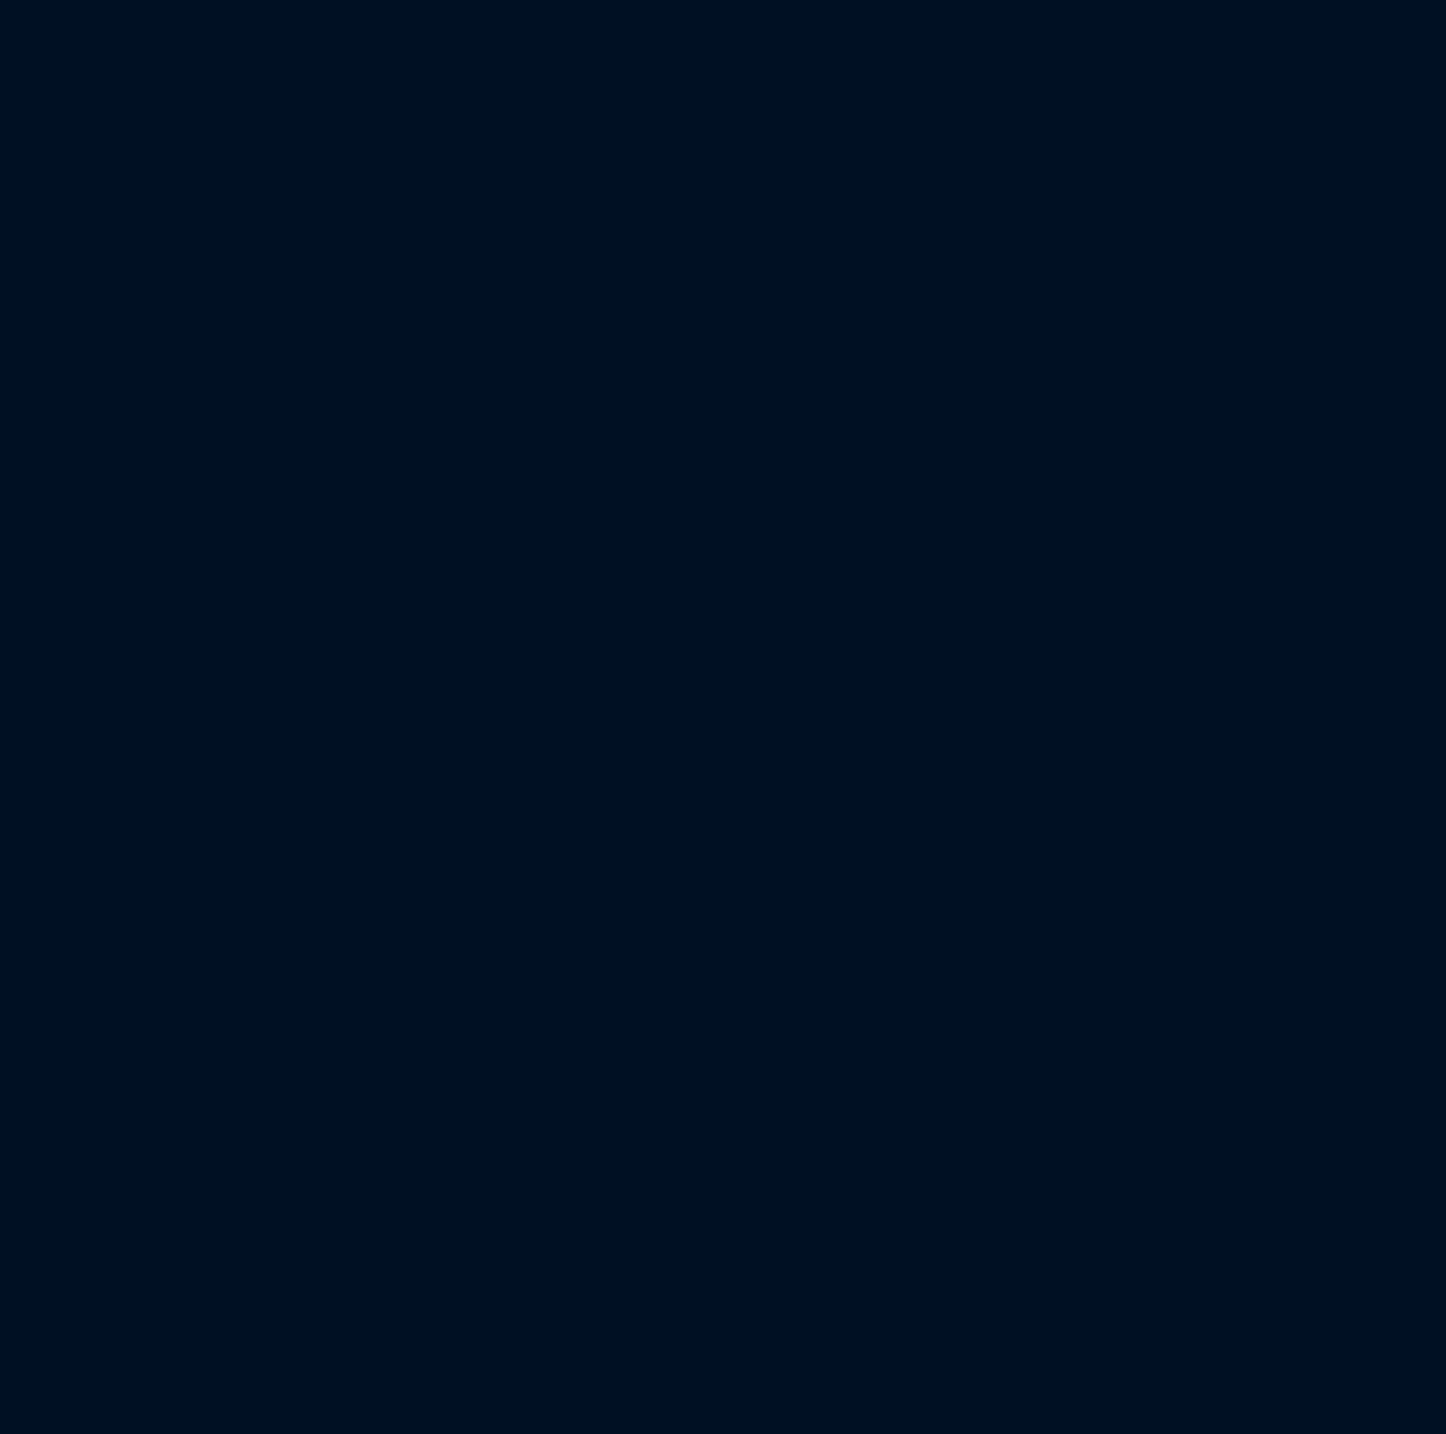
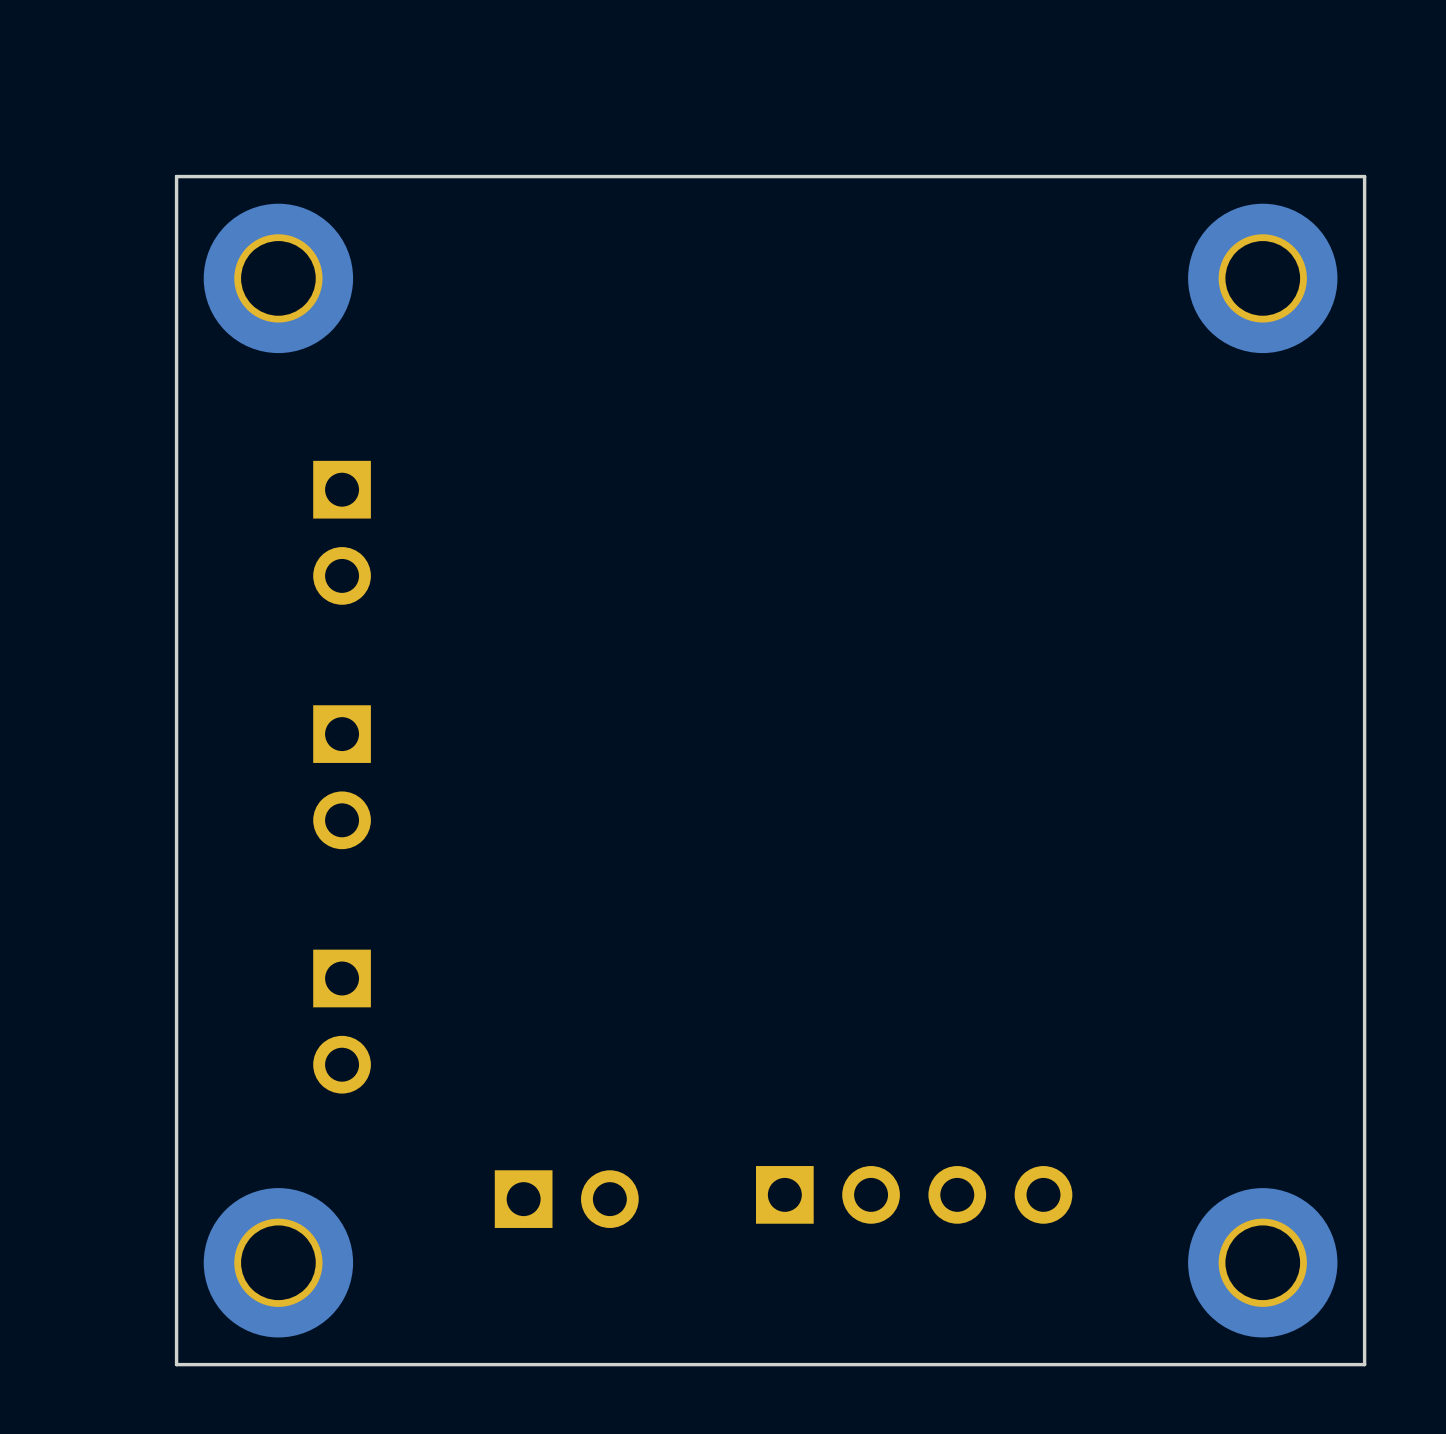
board edge: none -> (1364, 176) (176, 176) (176, 1364) (1364, 1364) (1364, 176)
part: none -> (278, 278)
part: none -> (1262, 278)
part: none -> (342, 532)
part: none -> (342, 777)
part: none -> (342, 1021)
part: none -> (914, 1194)
part: none -> (566, 1199)
part: none -> (278, 1262)
part: none -> (1262, 1262)

